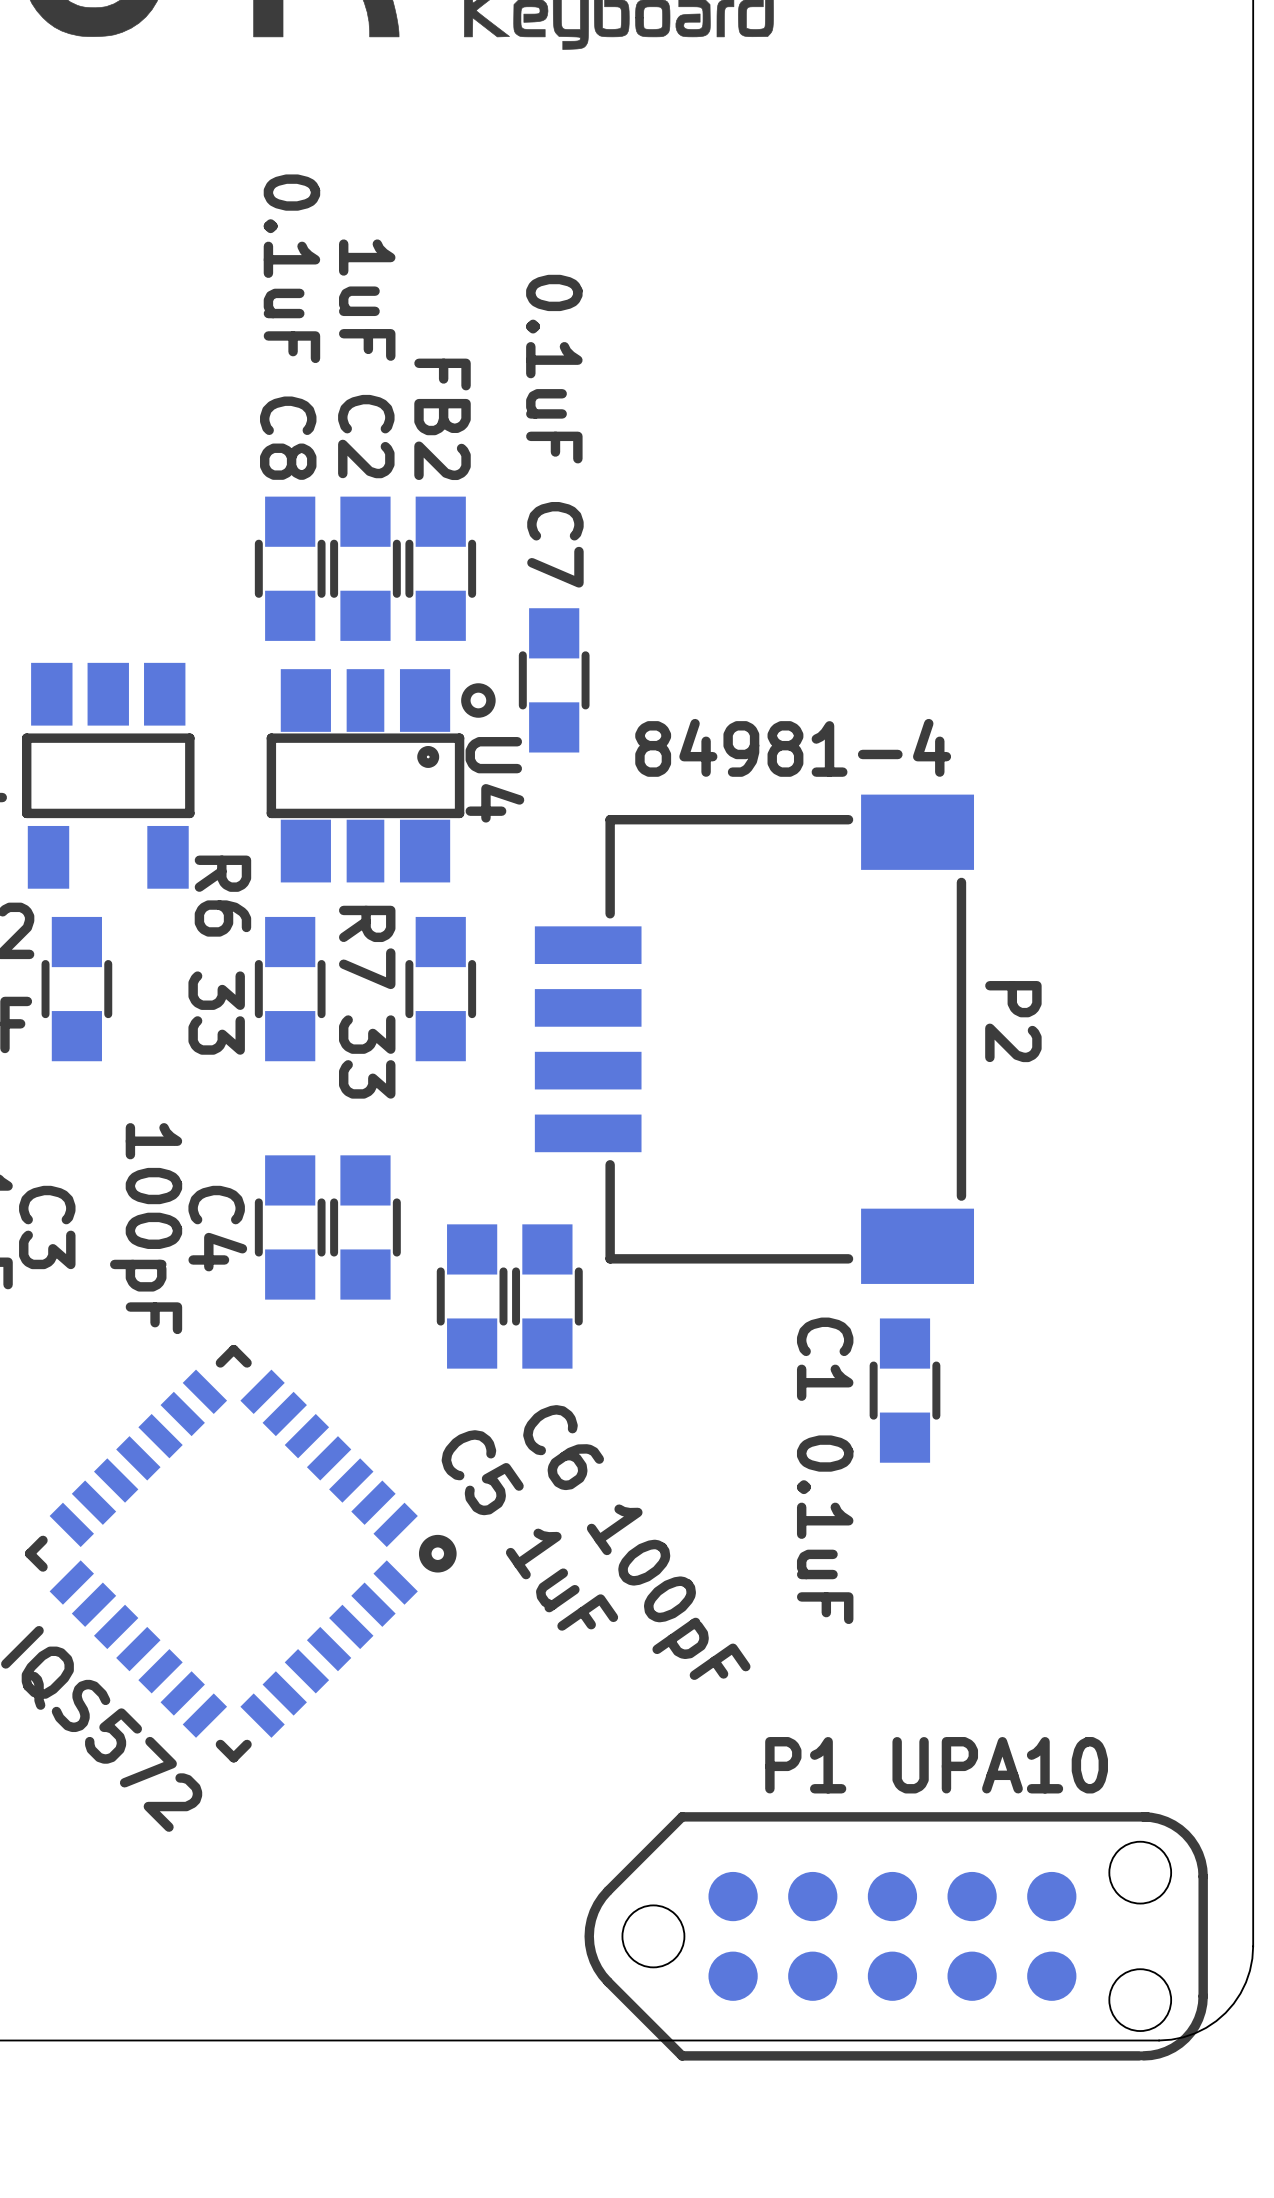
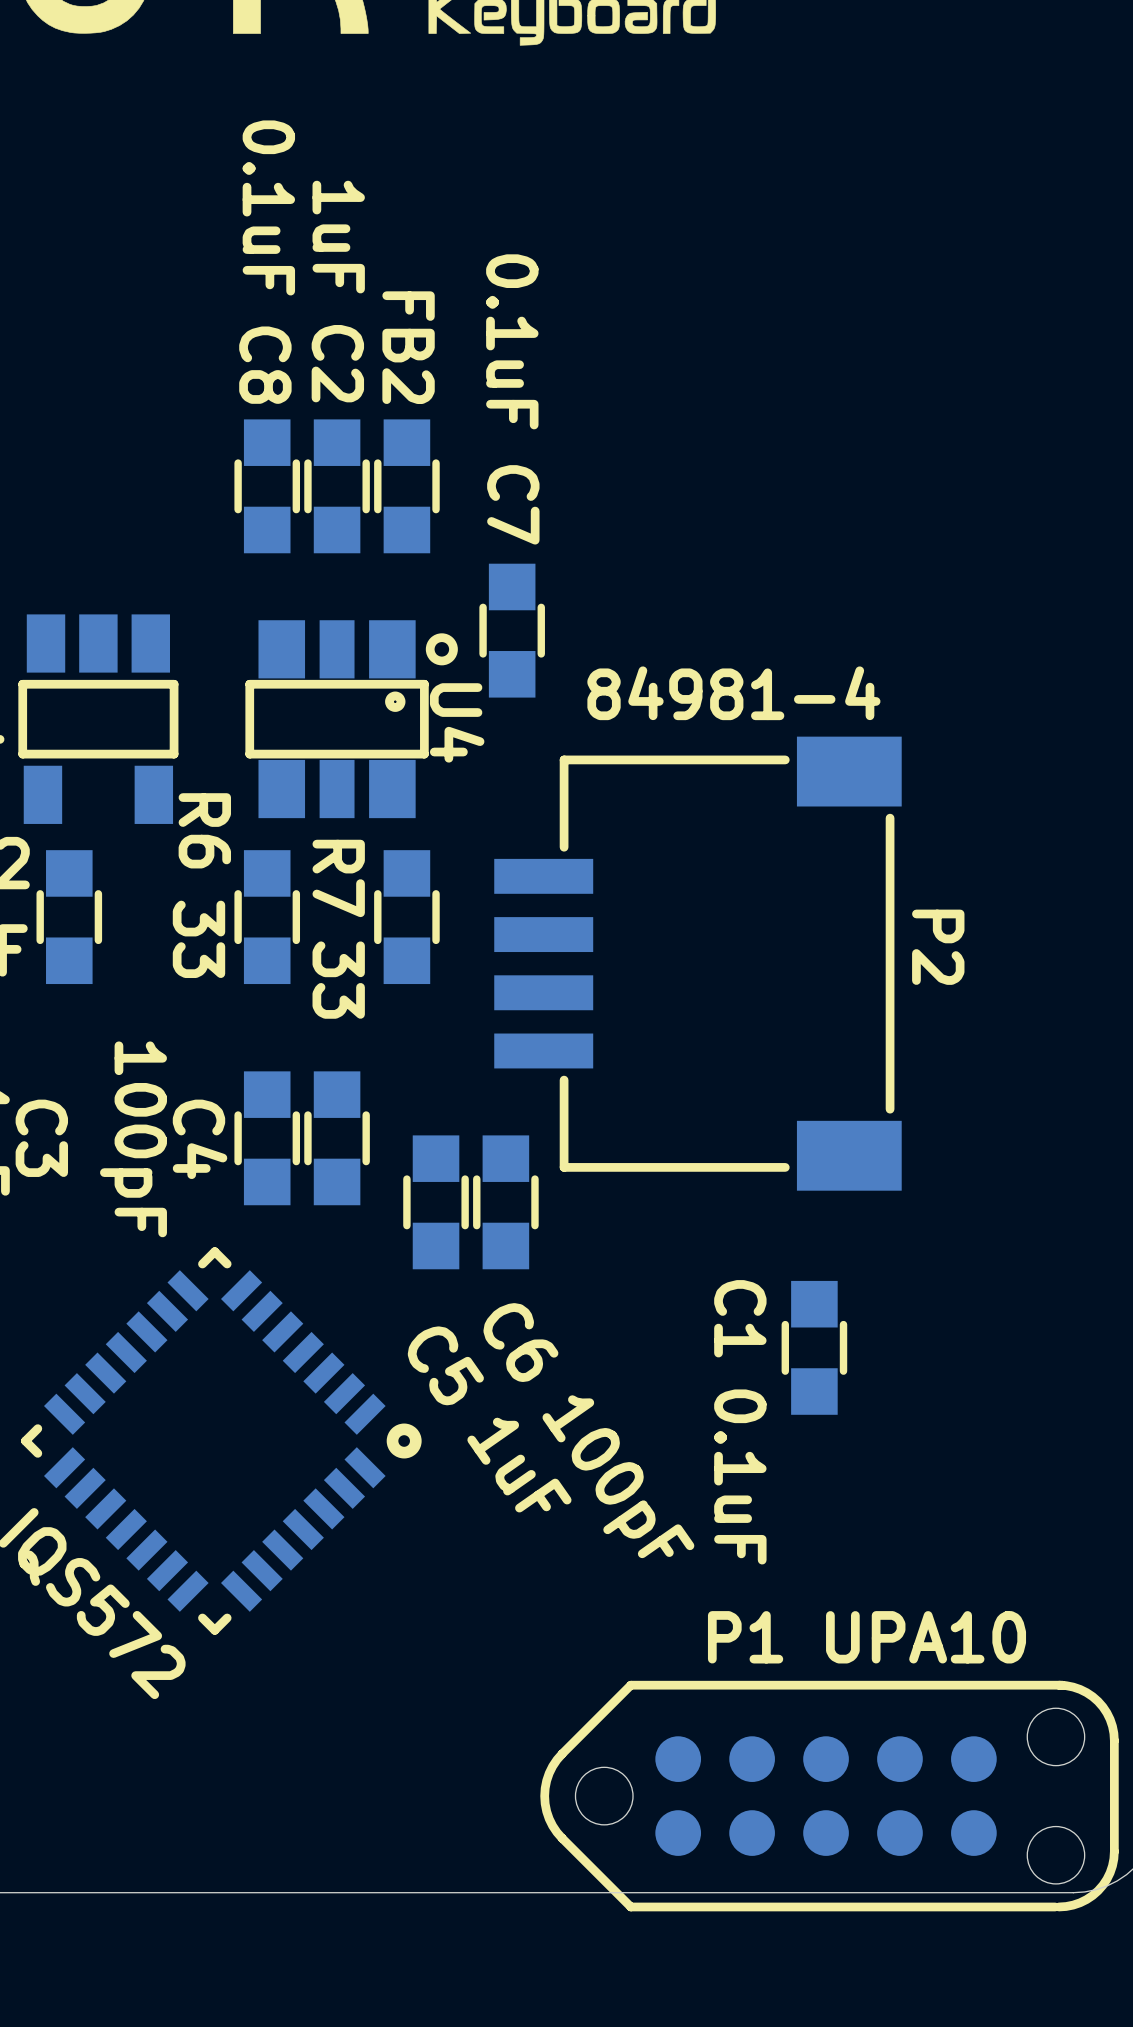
C8 position: (290, 568) -> (267, 486)
C2 position: (365, 568) -> (337, 486)
FB2 position: (440, 568) -> (406, 486)
C1 position: (904, 1390) -> (814, 1347)

